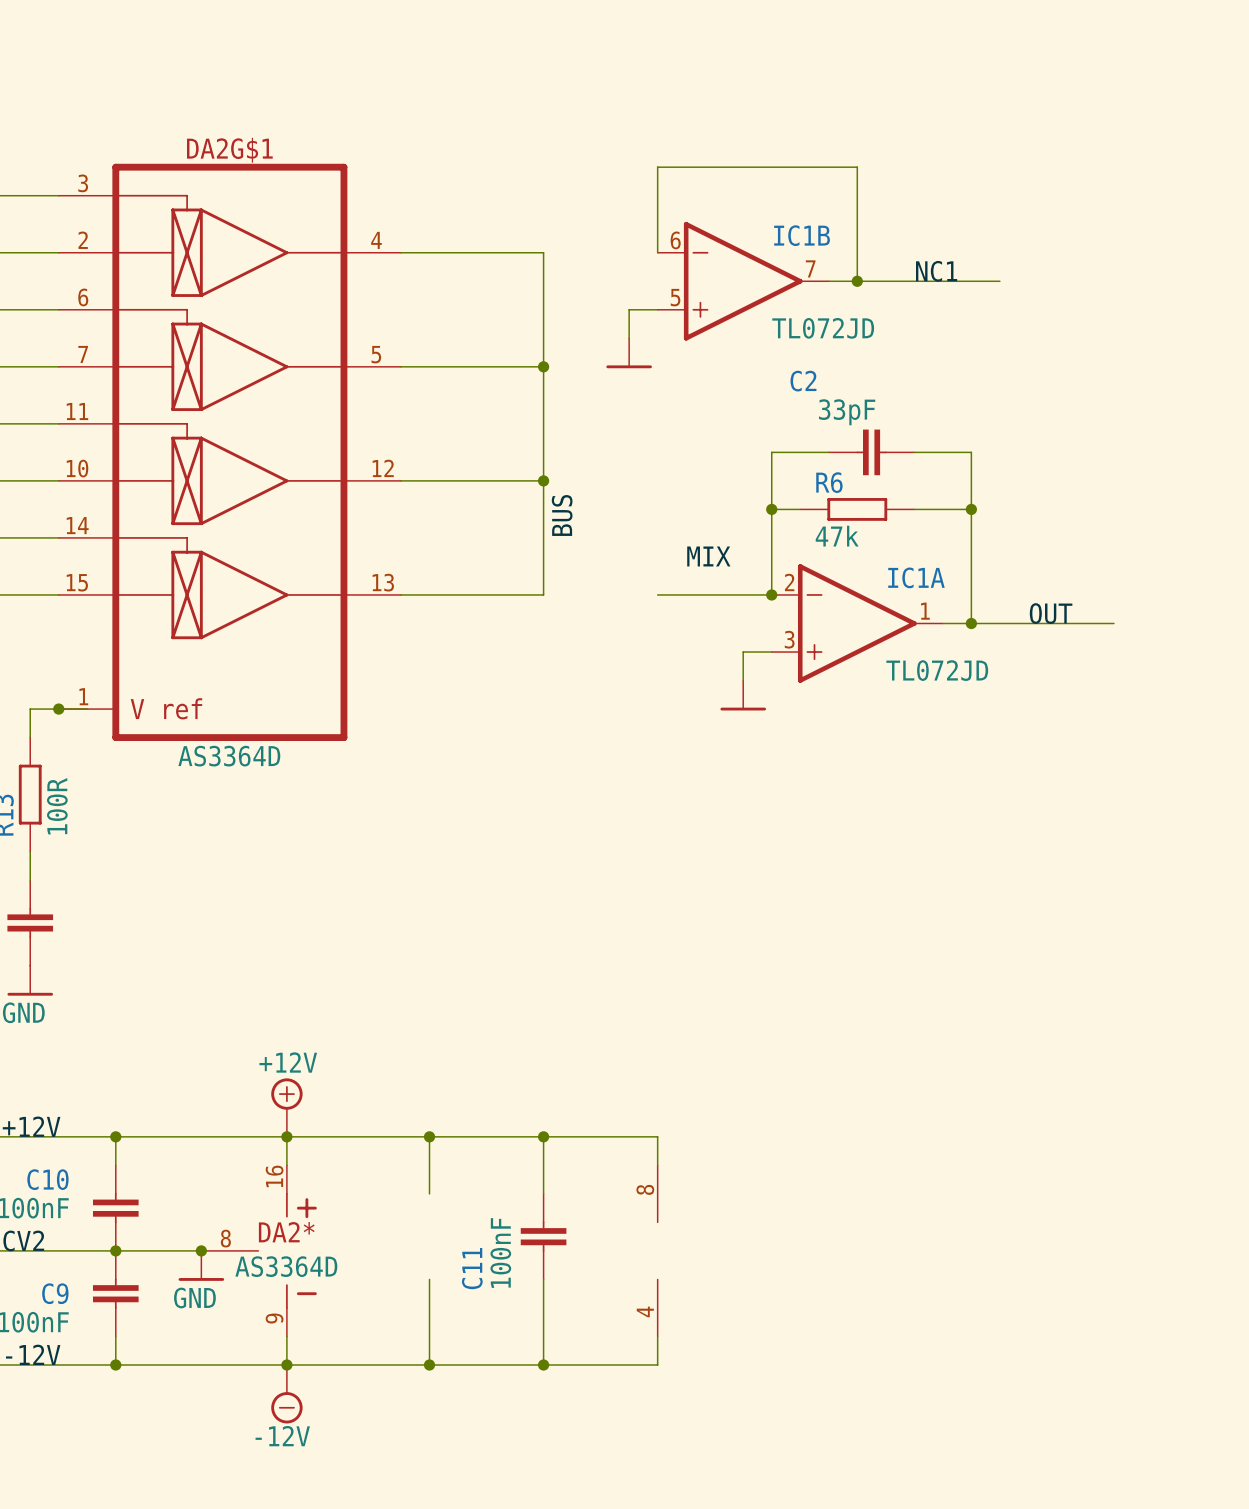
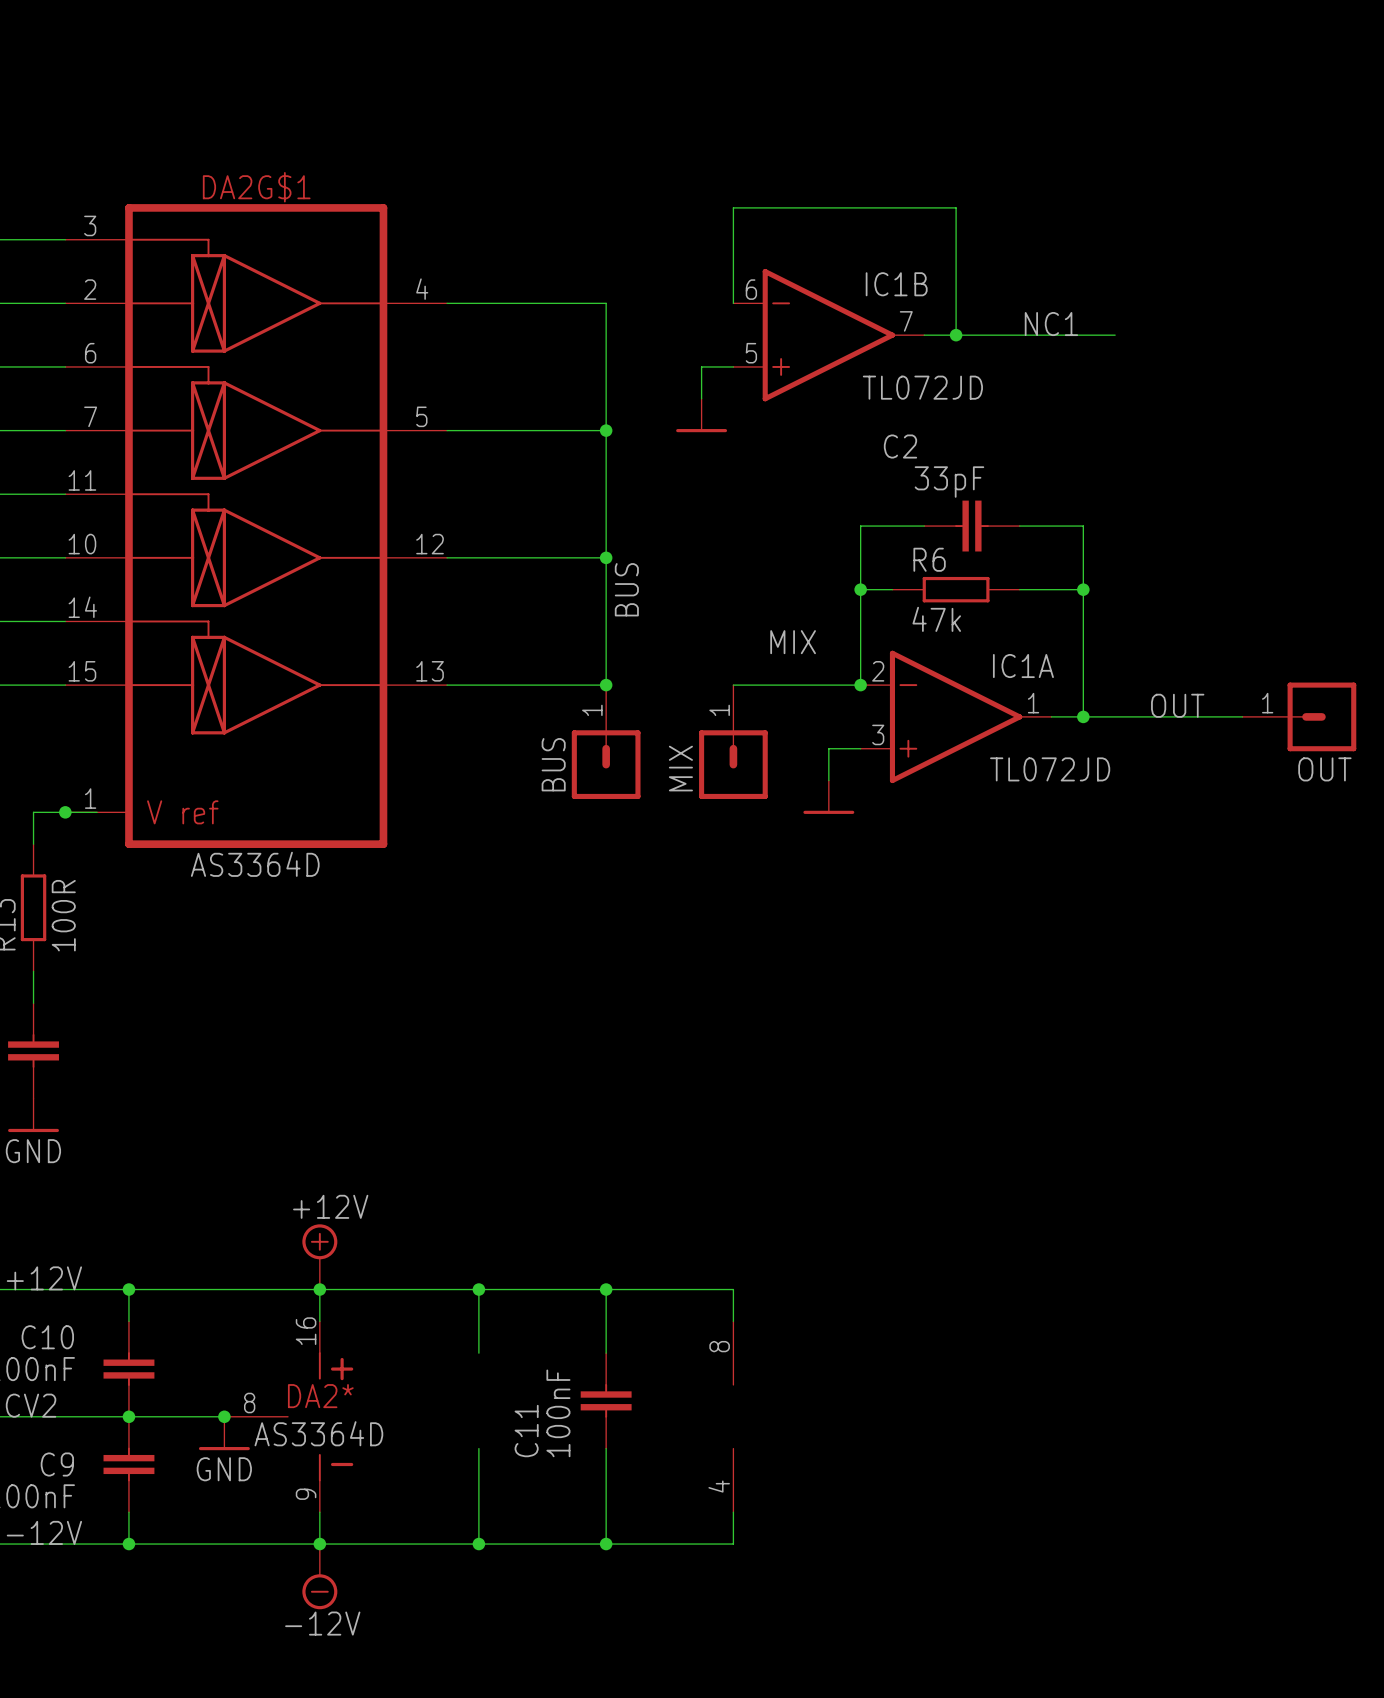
junction: none -> (606, 685)
OUT: none -> (1299, 716)
BUS: none -> (606, 742)
MIX: none -> (733, 742)

